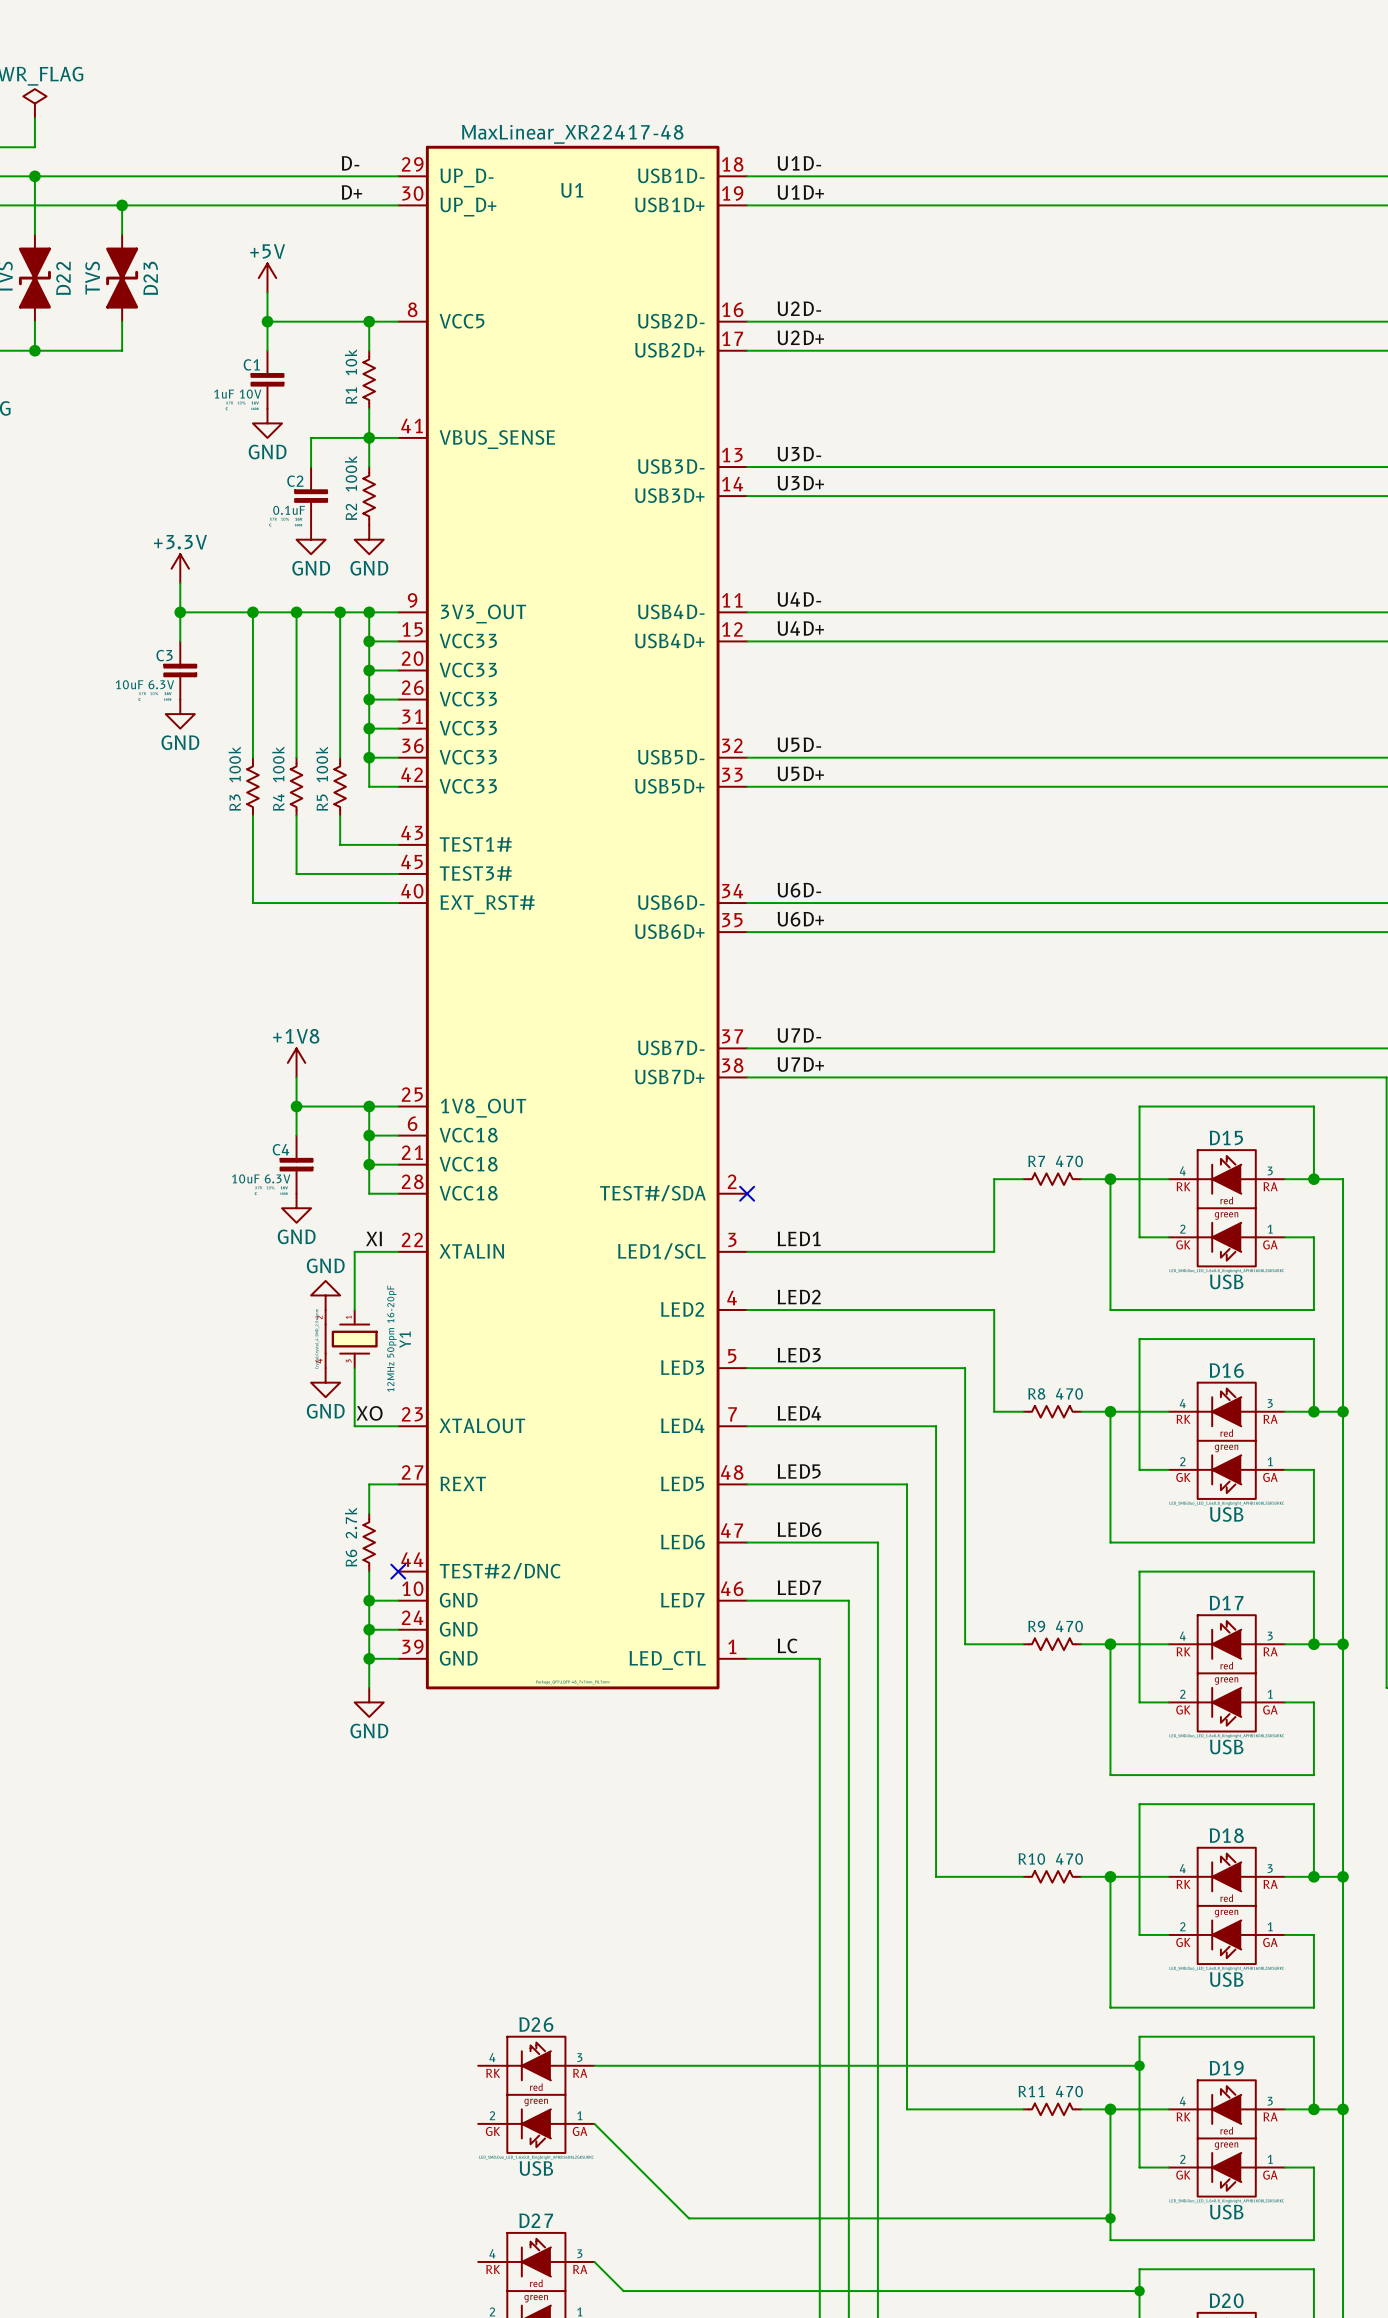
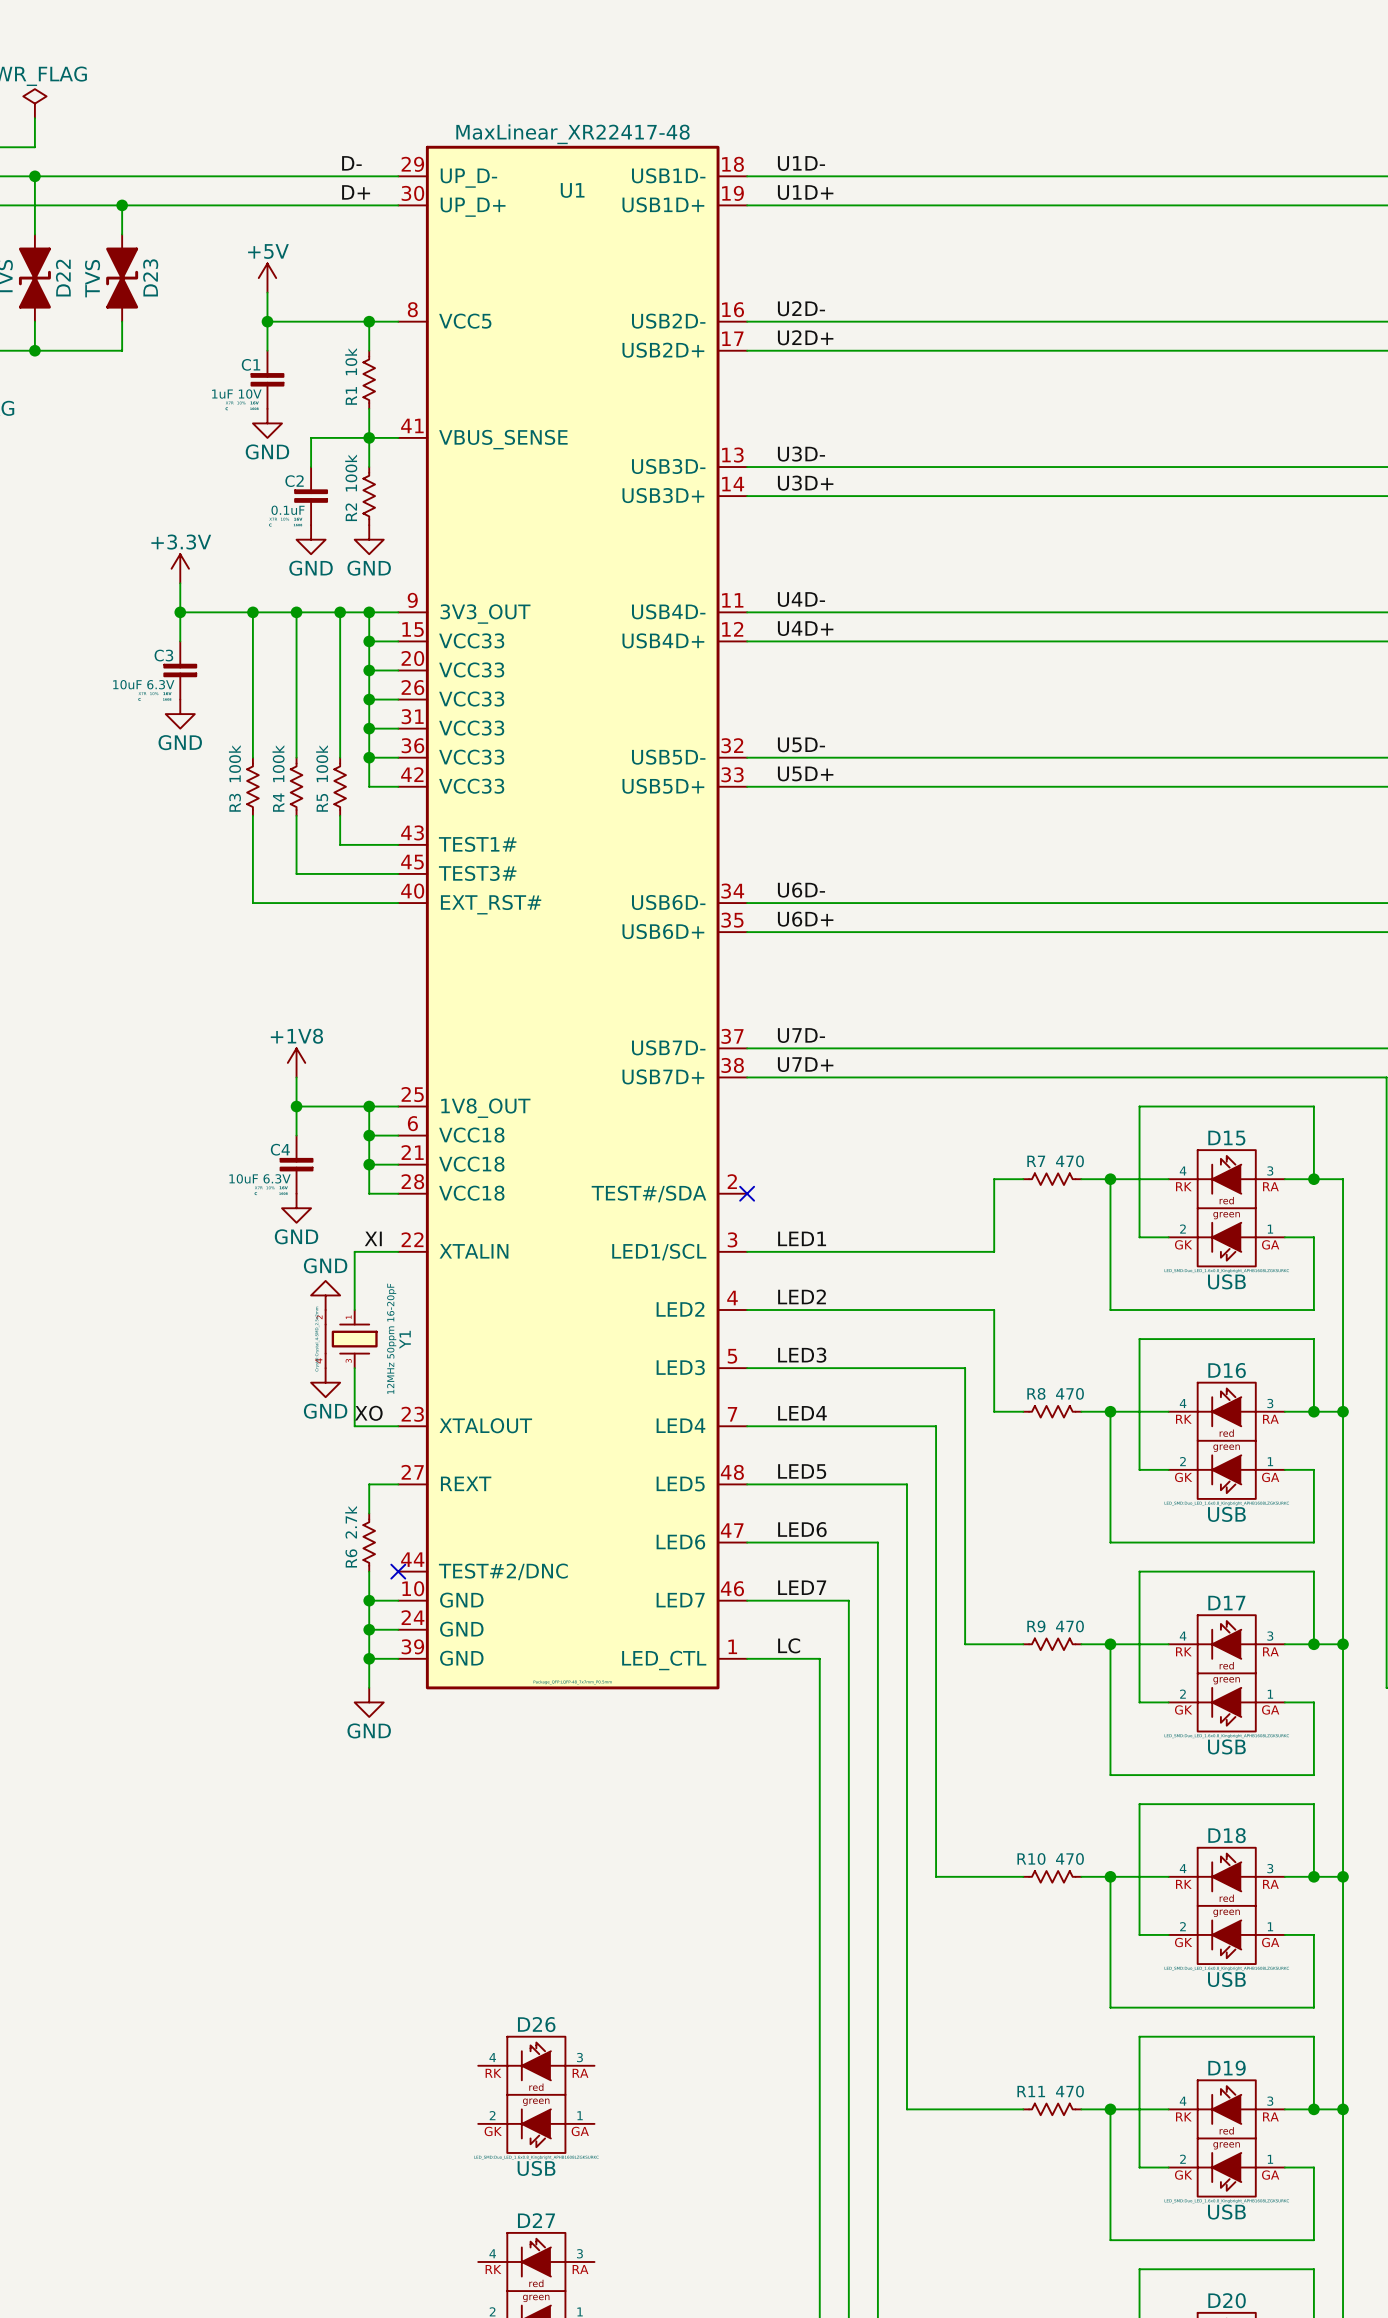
wire: (594, 2065) (1139, 2065) -> none
junction: (1139, 2065) -> none
wire: (594, 2123) (688, 2218) (1110, 2218) -> none
junction: (1110, 2218) -> none
wire: (594, 2261) (623, 2291) (1139, 2291) -> none
junction: (1139, 2291) -> none

